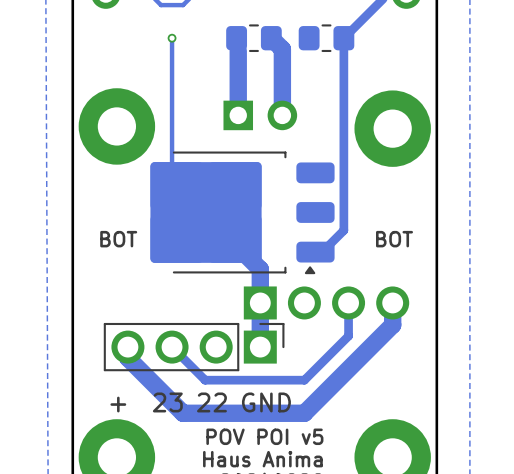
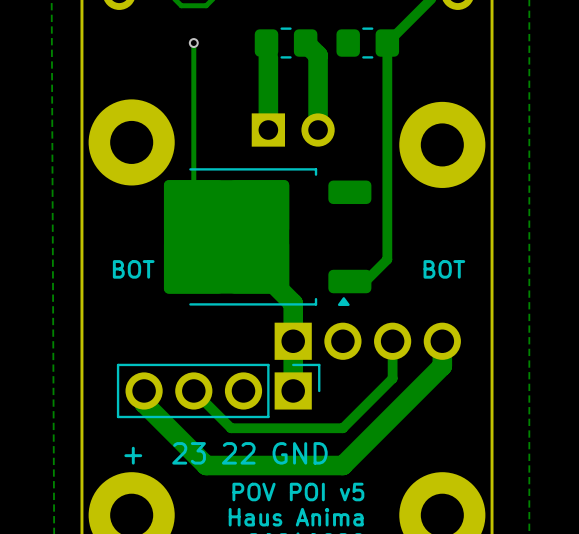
part footprint: [150, 151, 335, 275] -> [163, 168, 372, 306]

